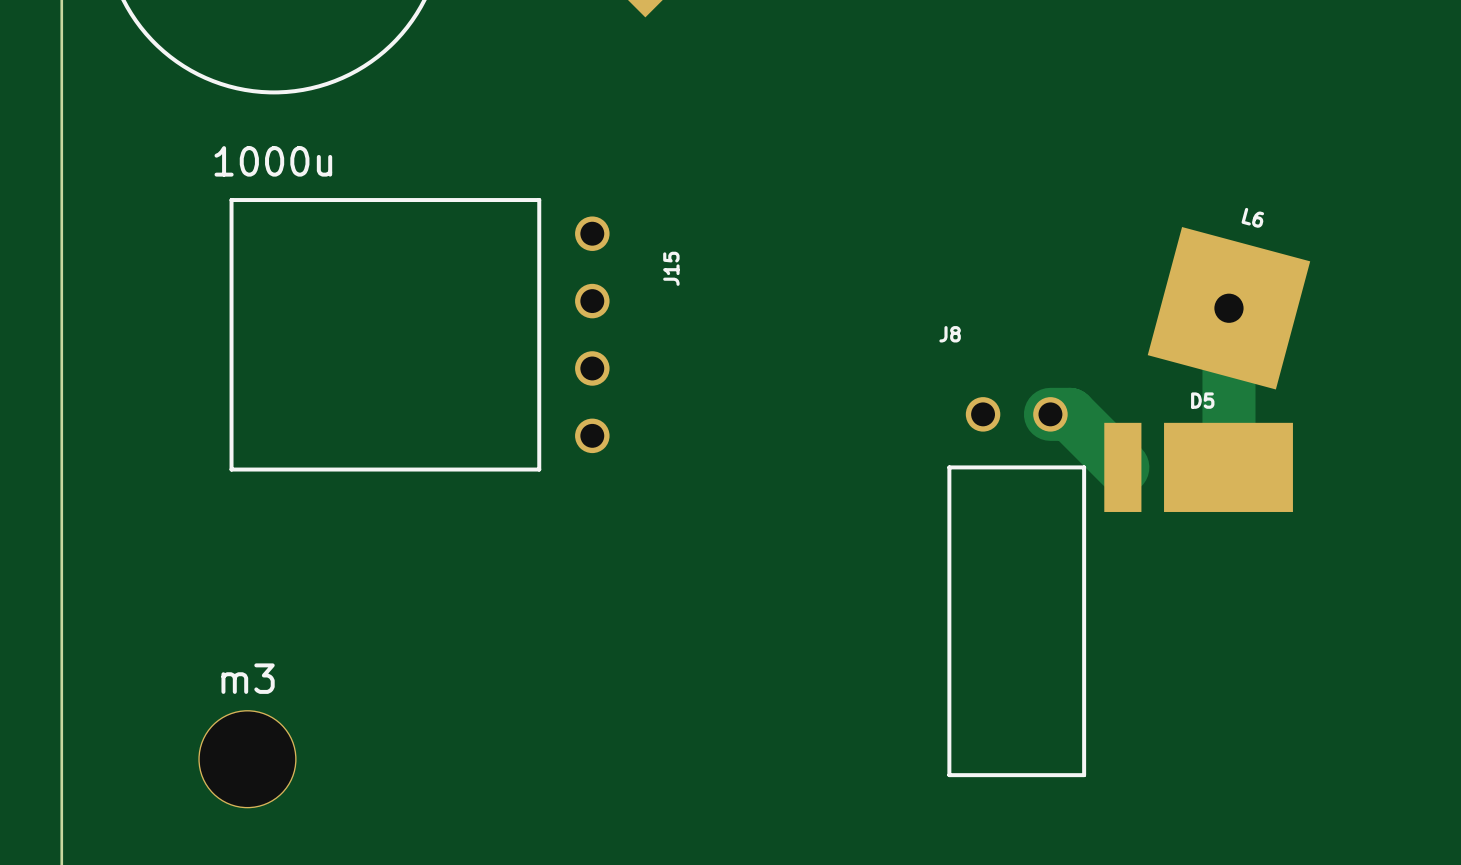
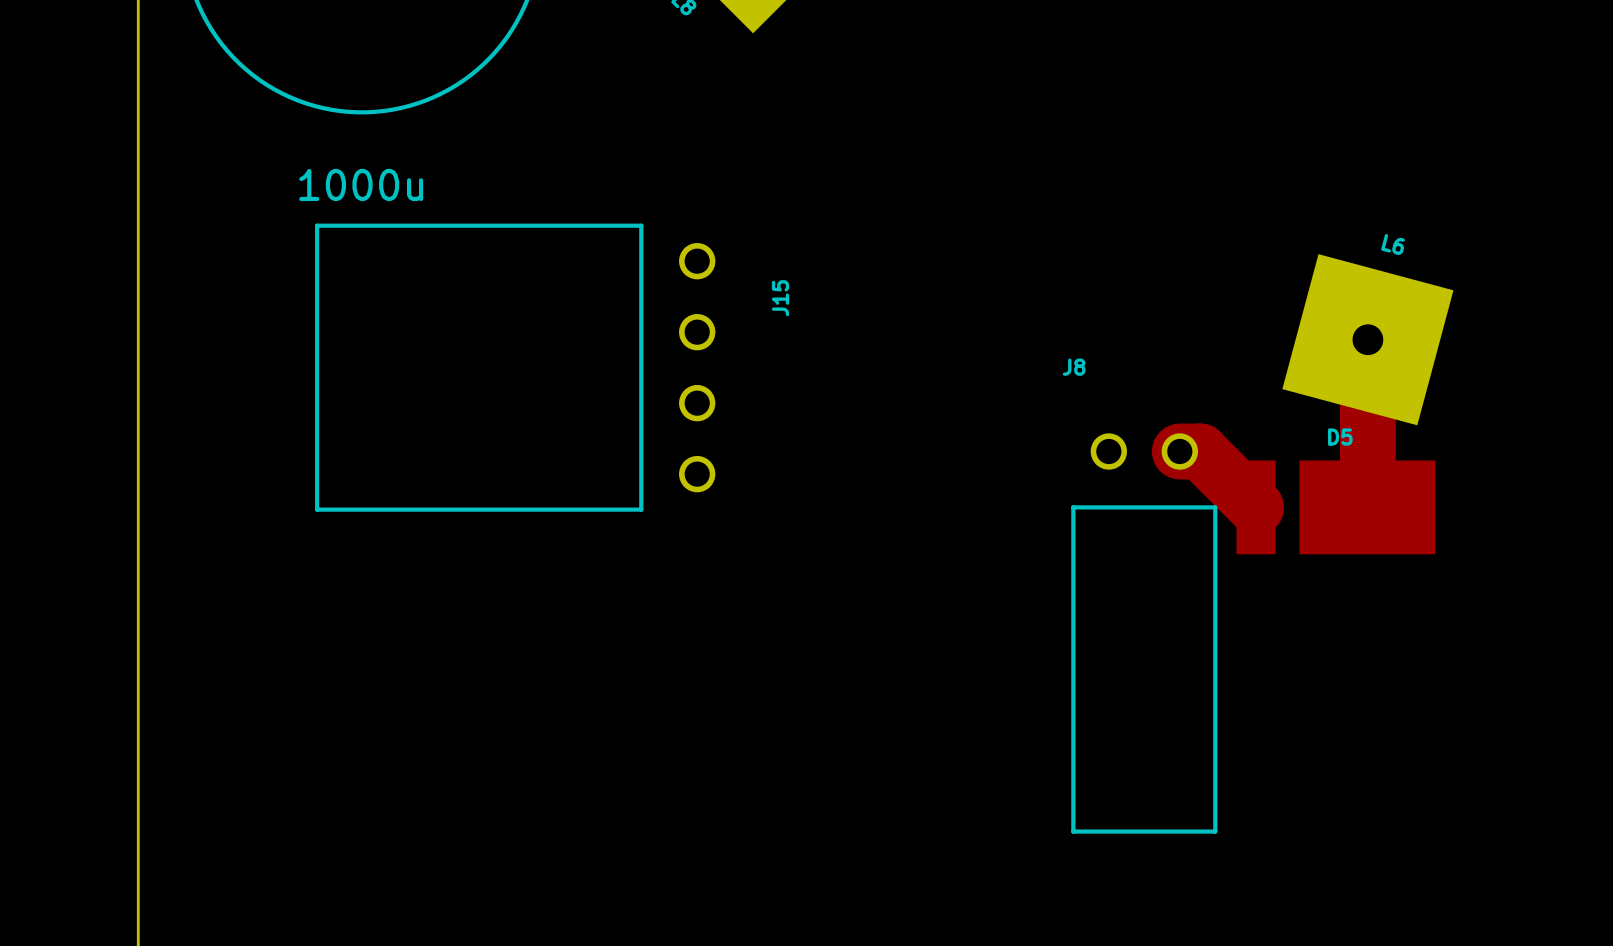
m3: (247, 759) -> none

